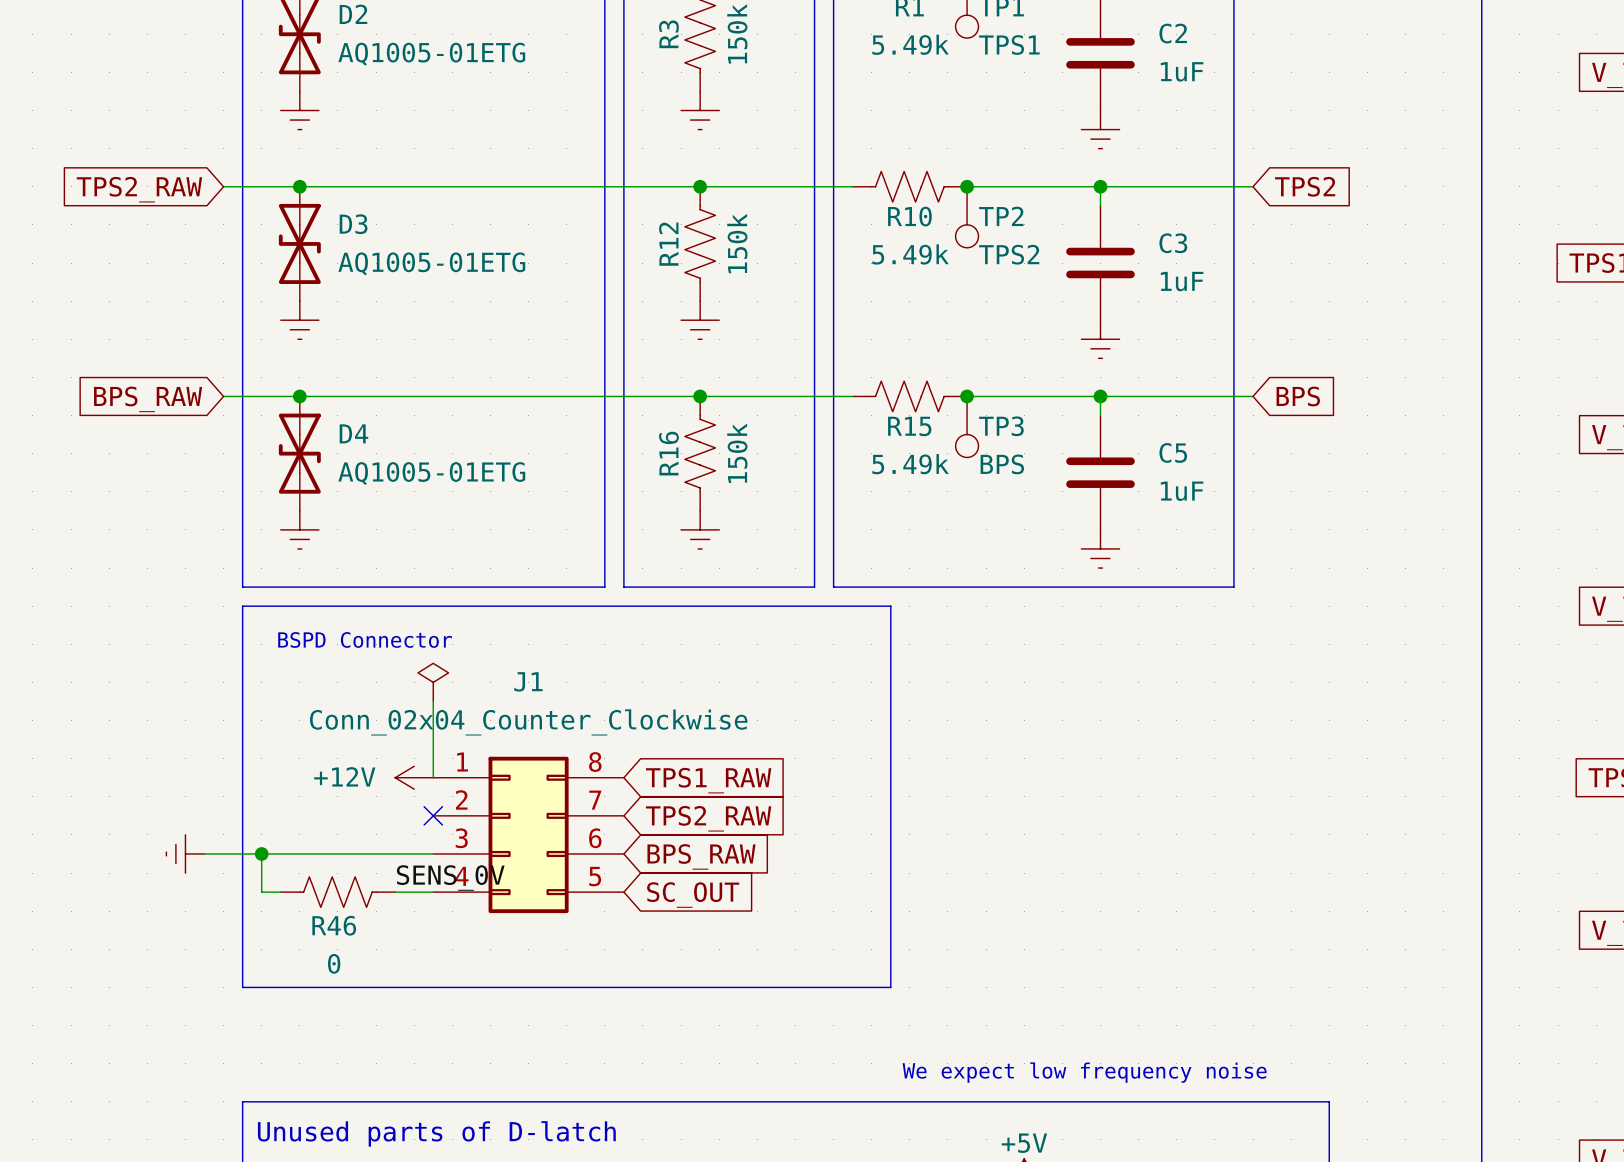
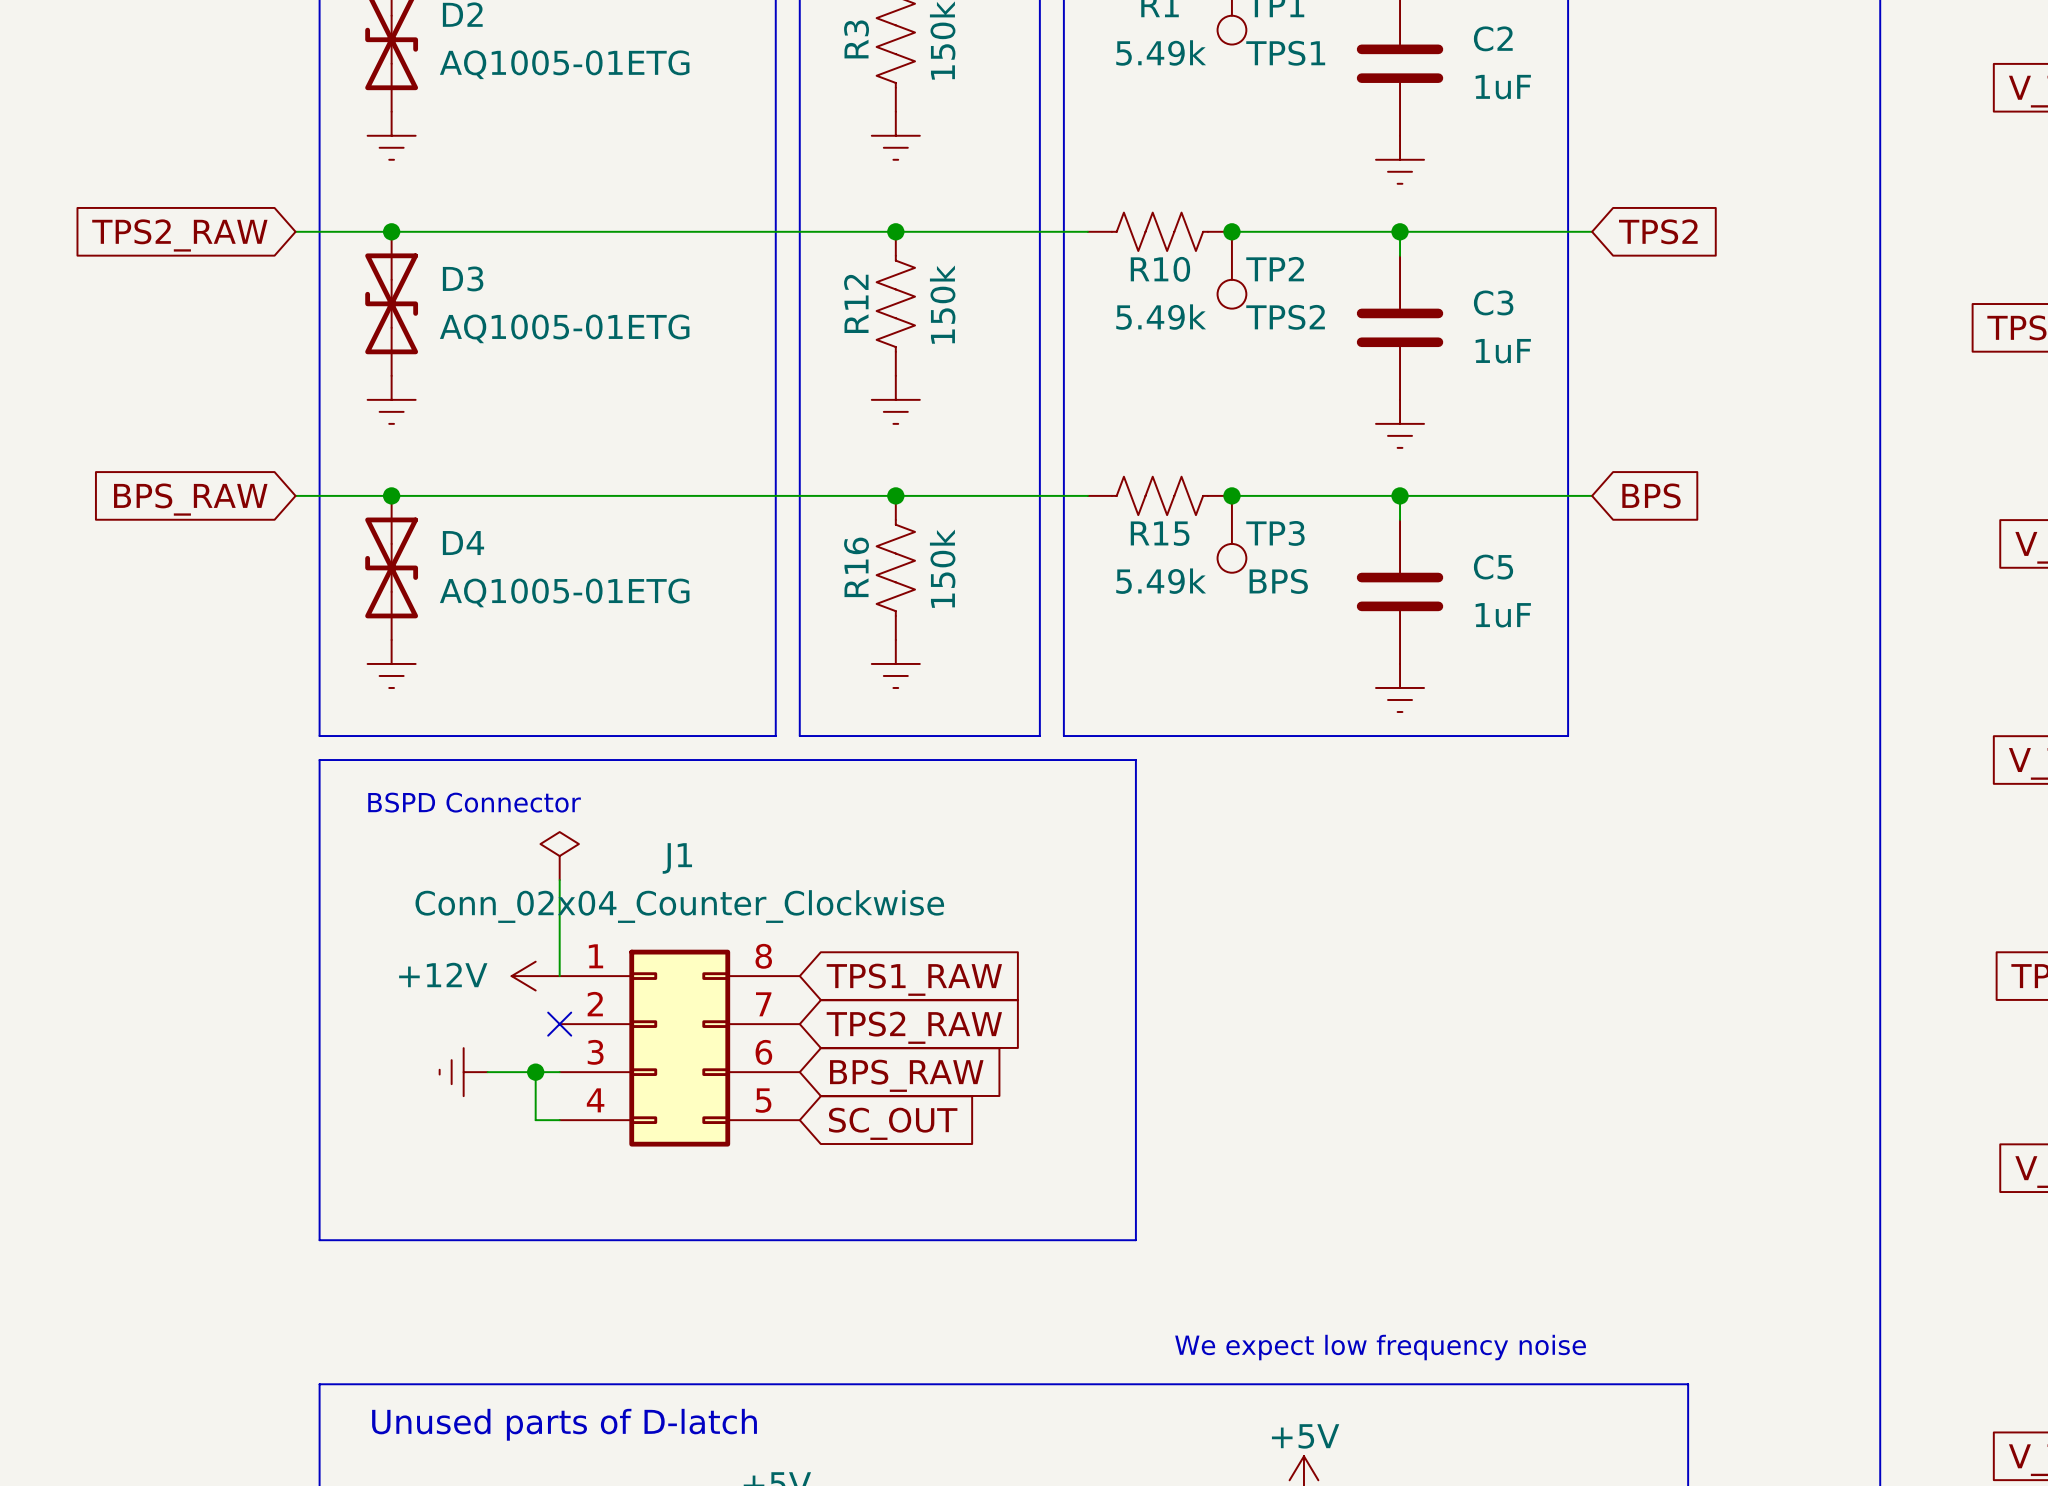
power symbol position: (185, 853) -> (463, 1072)
wire: (204, 853) (376, 853) -> none
wire: (261, 853) (261, 892) (280, 892) -> none
junction: (261, 853) -> none
junction: none -> (535, 1072)
label: SENS_0V (450, 878) -> none
R46: 0 (337, 892) -> none
wire: (395, 892) (414, 892) -> (535, 1072) (535, 1120)

